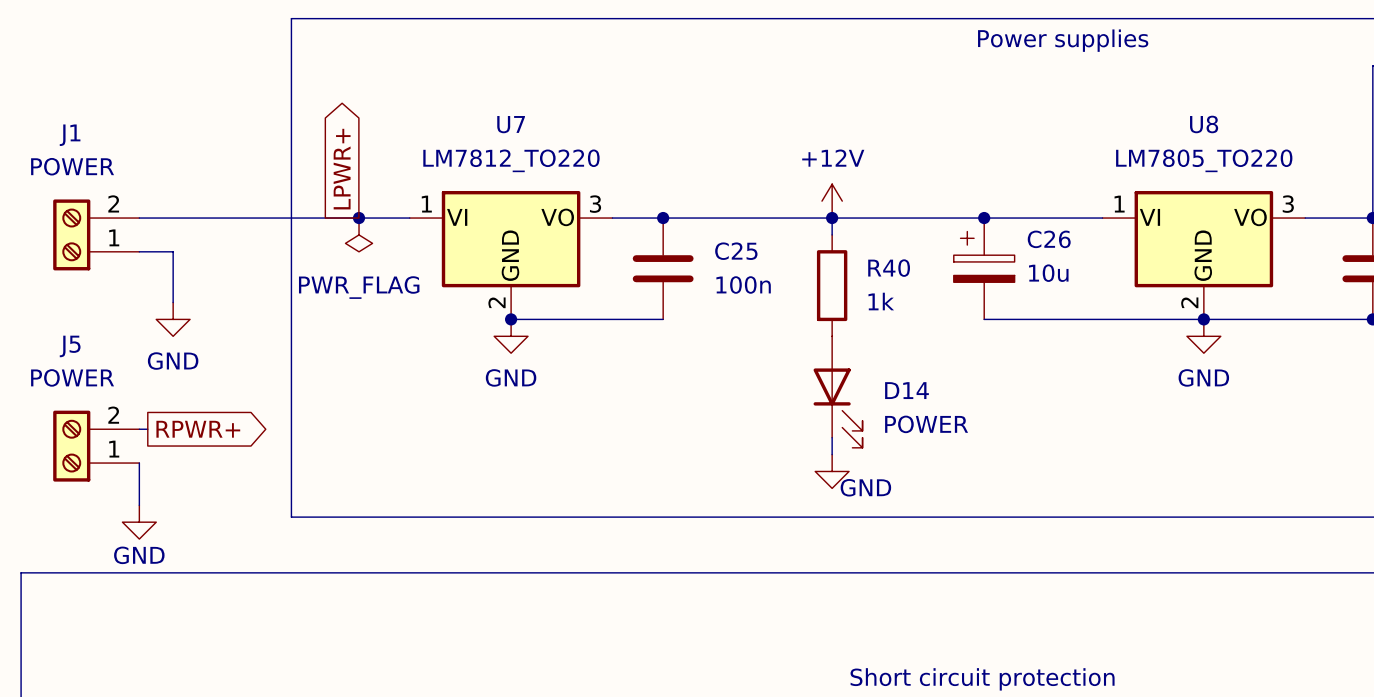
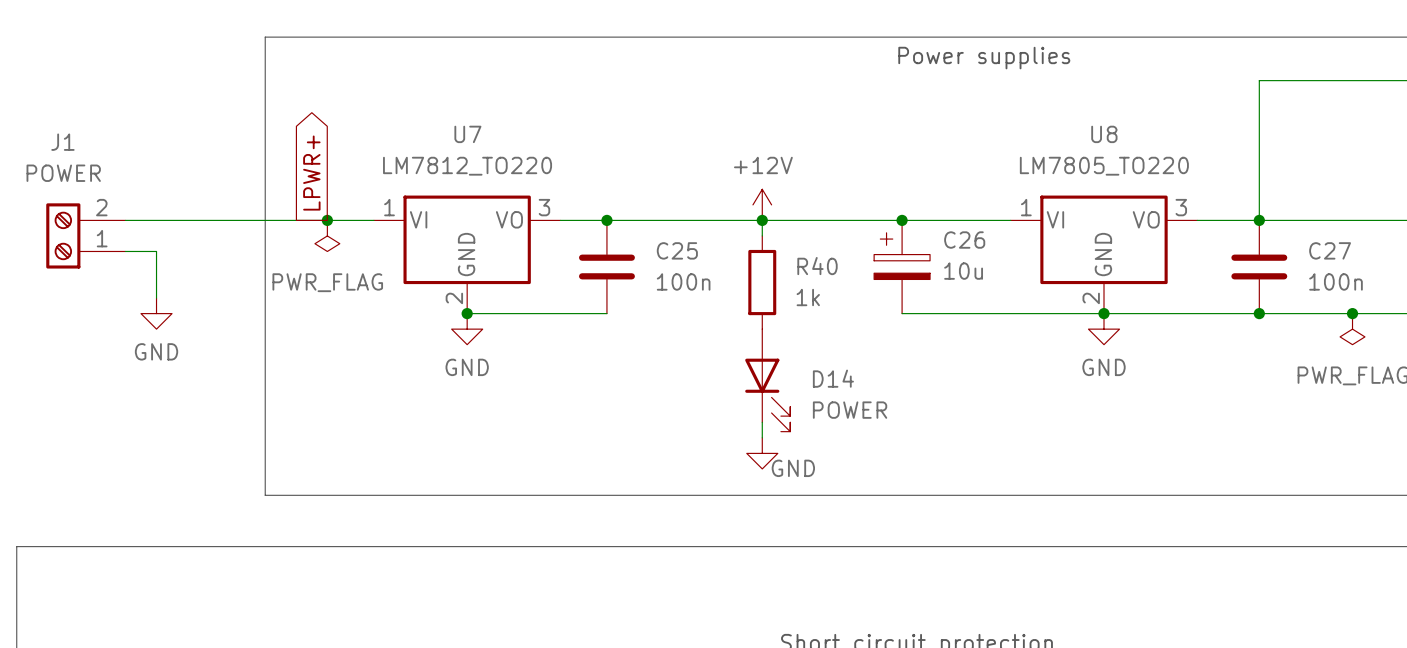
wire: (139, 429) (147, 429) -> none
global label: RPWR+ (198, 429) -> none
J5: POWER (96, 446) -> none
wire: (139, 463) (139, 505) -> none
power symbol: GND (139, 522) -> none

